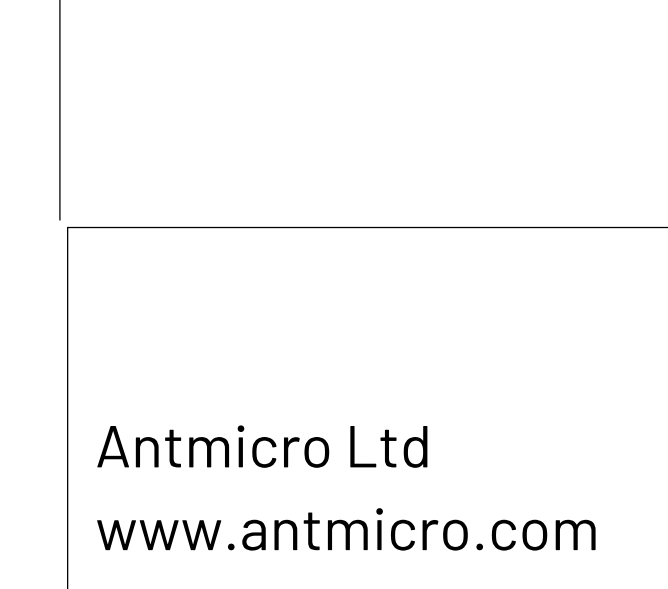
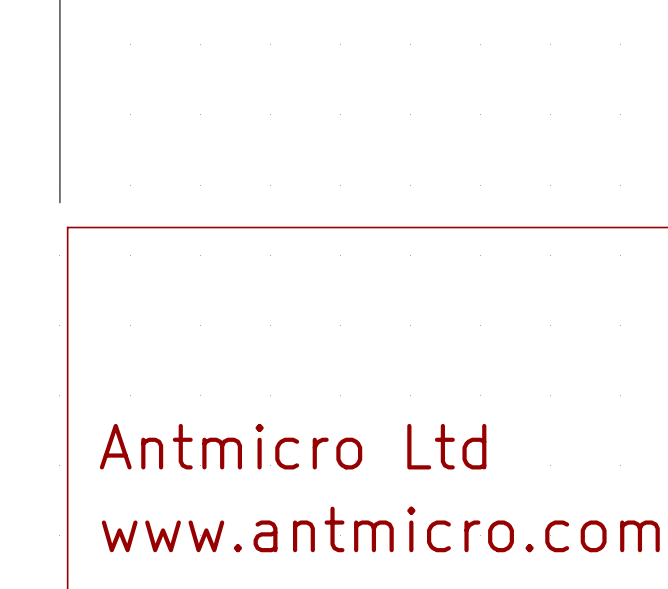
line: (59, 202) (59, 220) -> none

